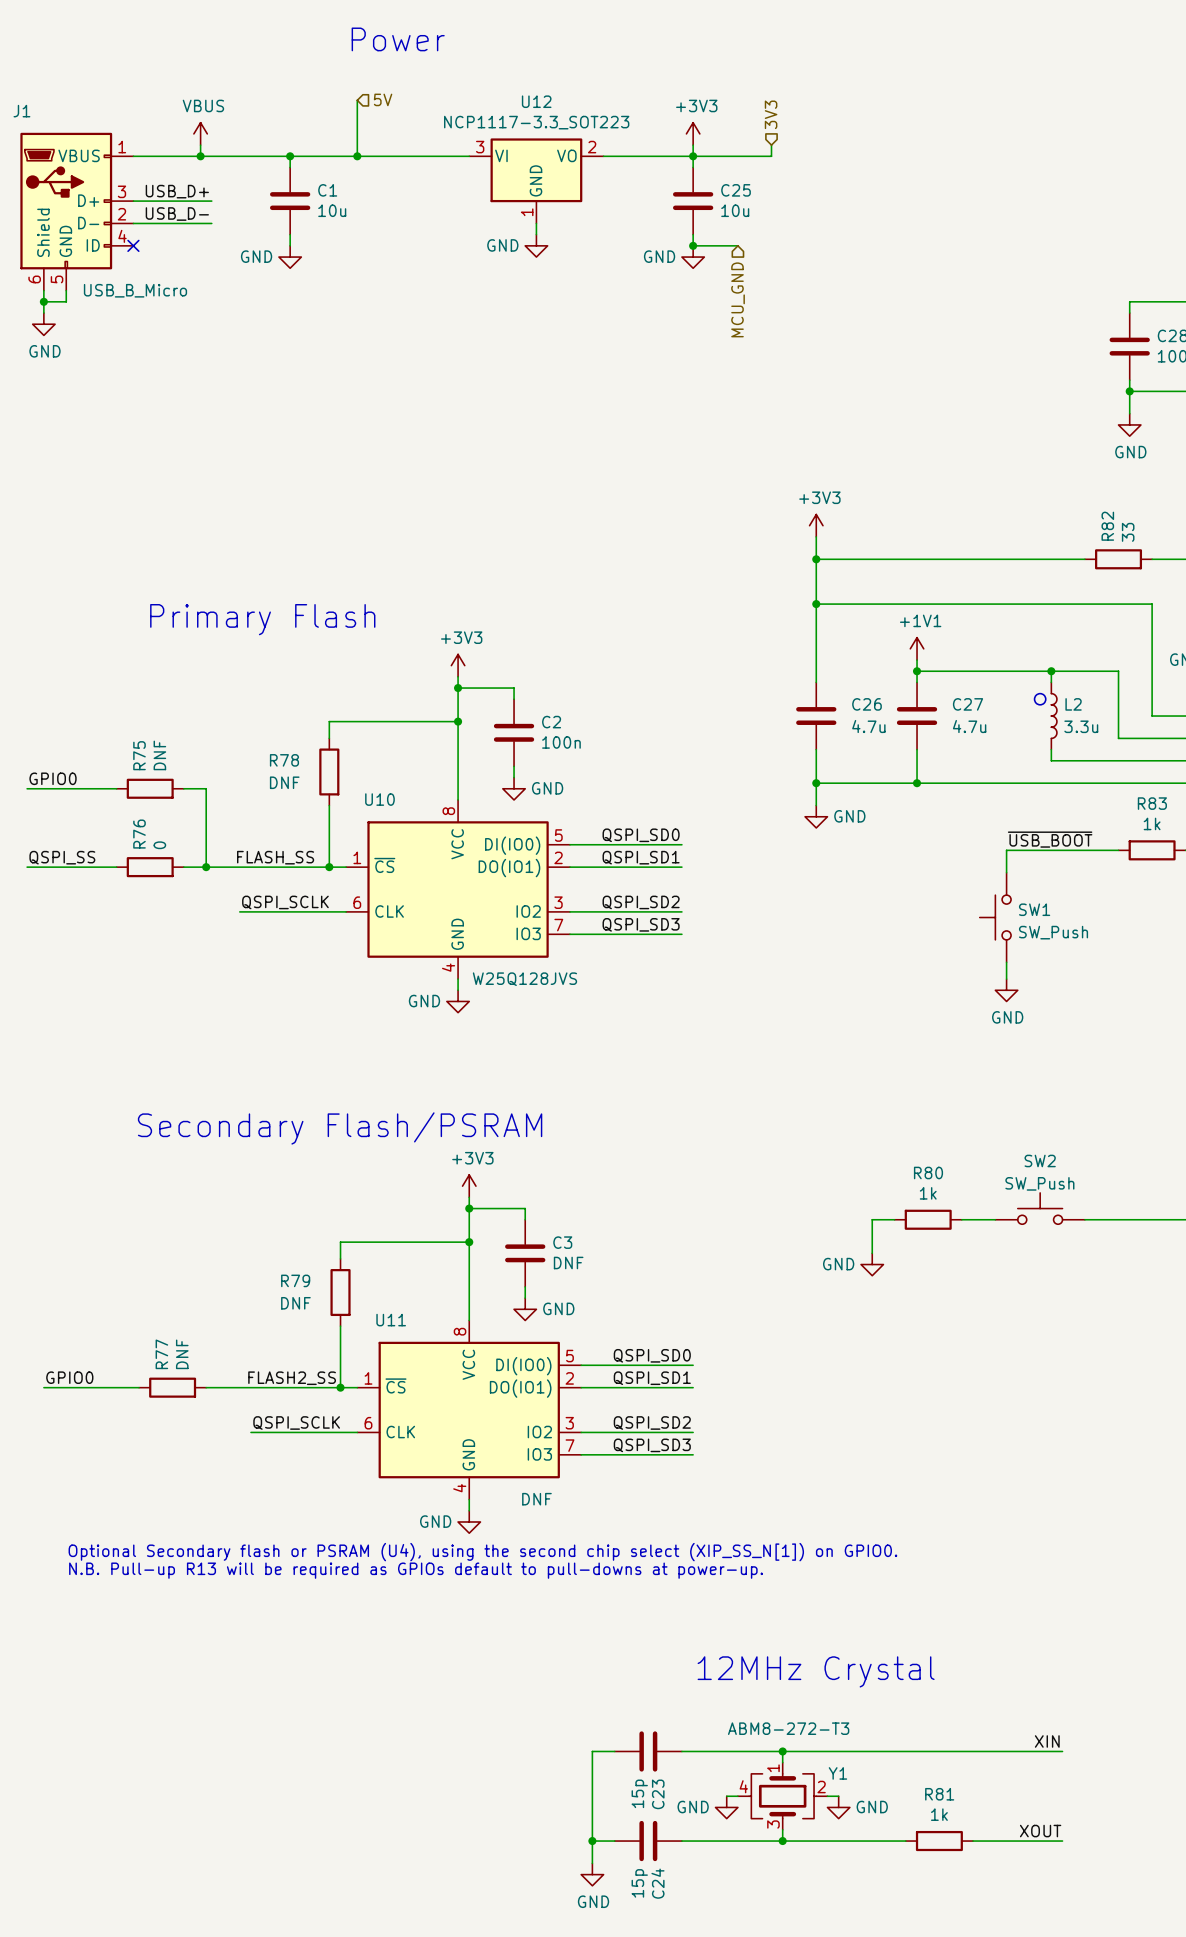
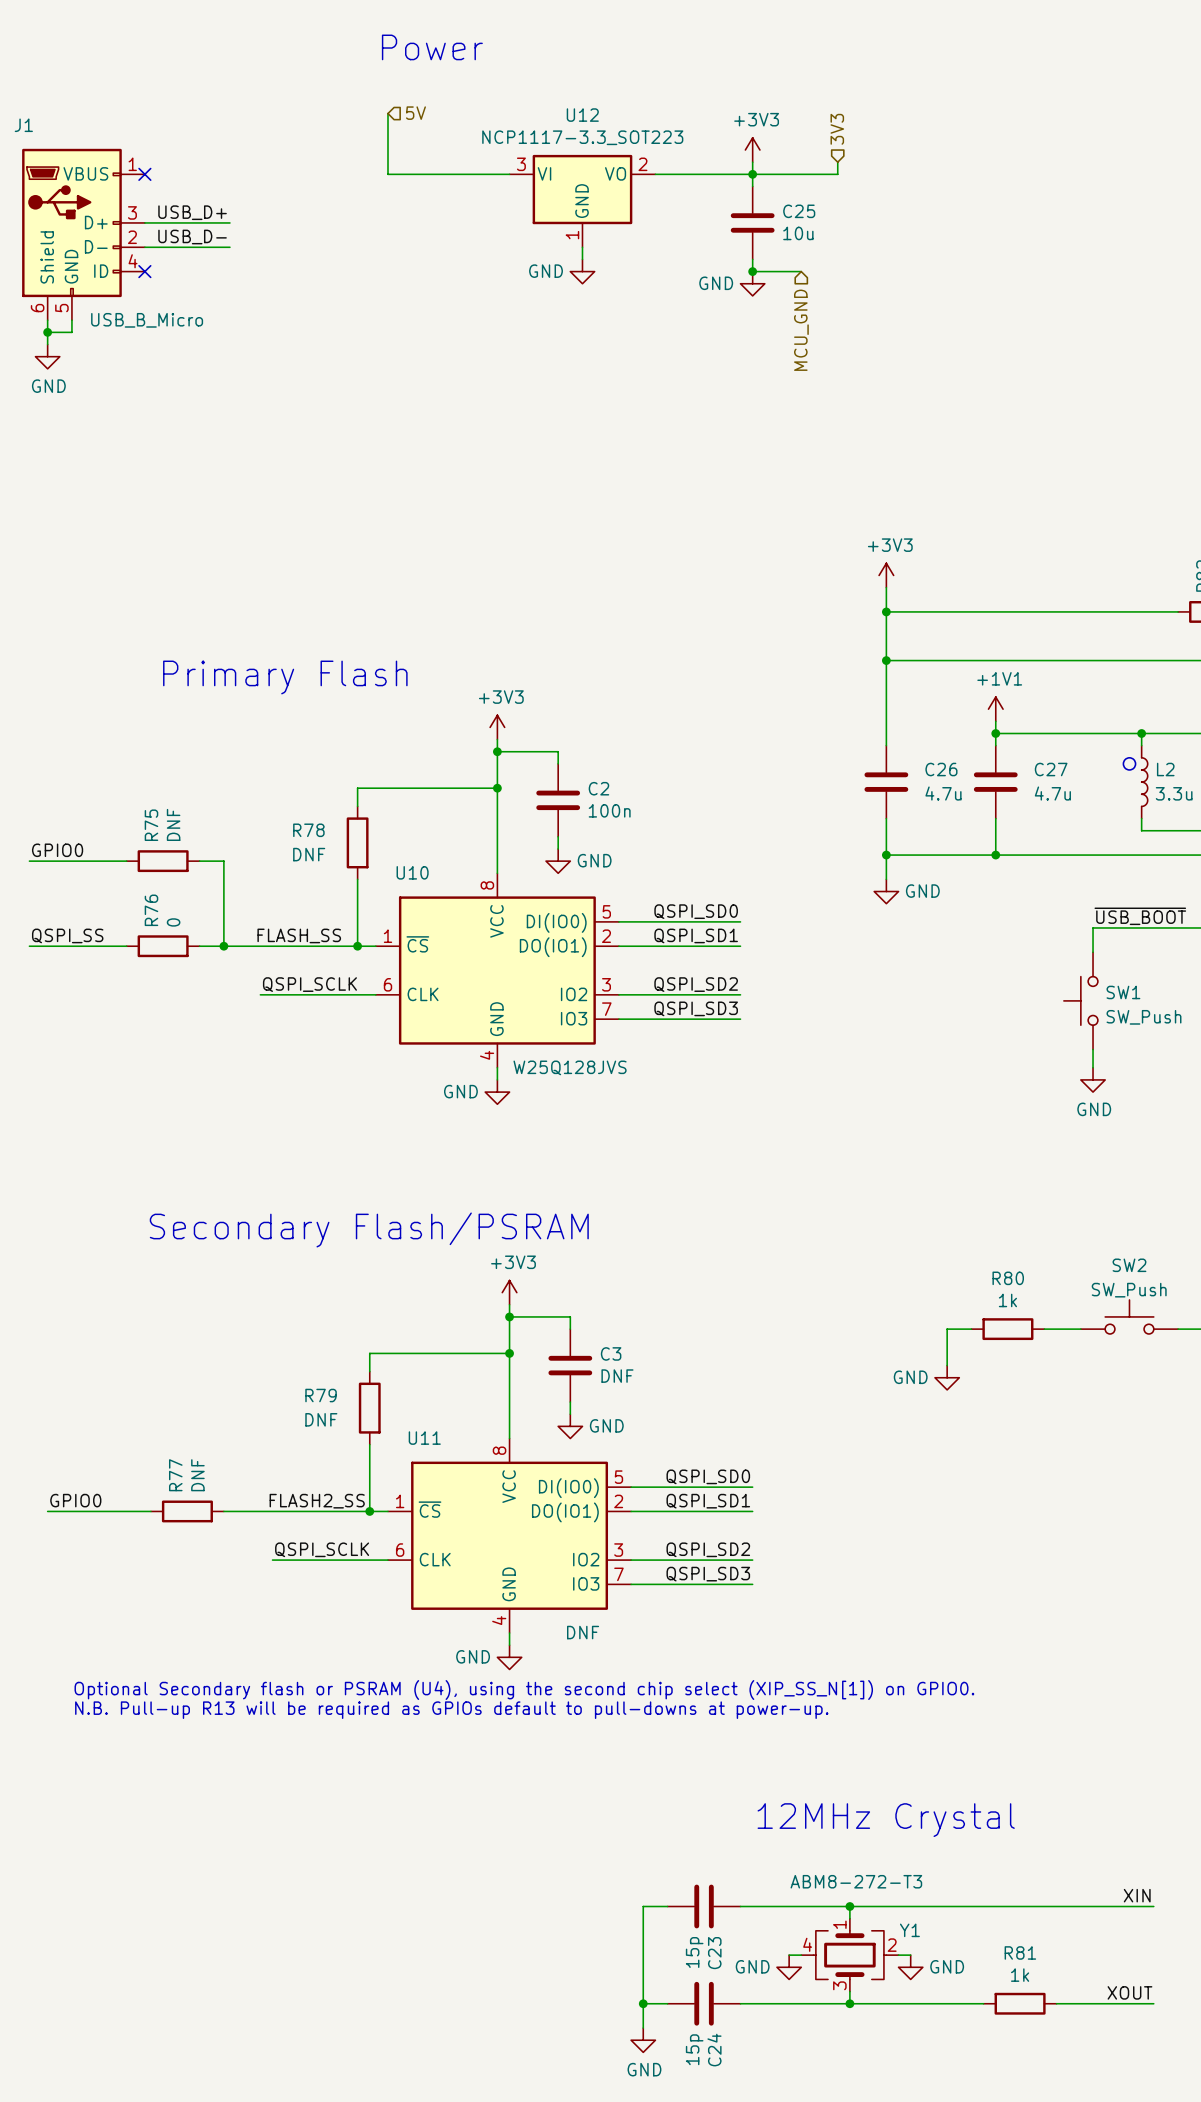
power symbol: VBUS (200, 133) -> none
wire: (200, 145) (200, 156) -> none
wire: (133, 156) (357, 156) -> none
no-connect mark: none -> (144, 174)
junction: (200, 156) -> none
wire: (290, 156) (290, 167) -> none
junction: (290, 156) -> none
junction: (357, 156) -> none
C1: 10u (290, 201) -> none
wire: (290, 234) (290, 245) -> none
power symbol: GND (290, 257) -> none

